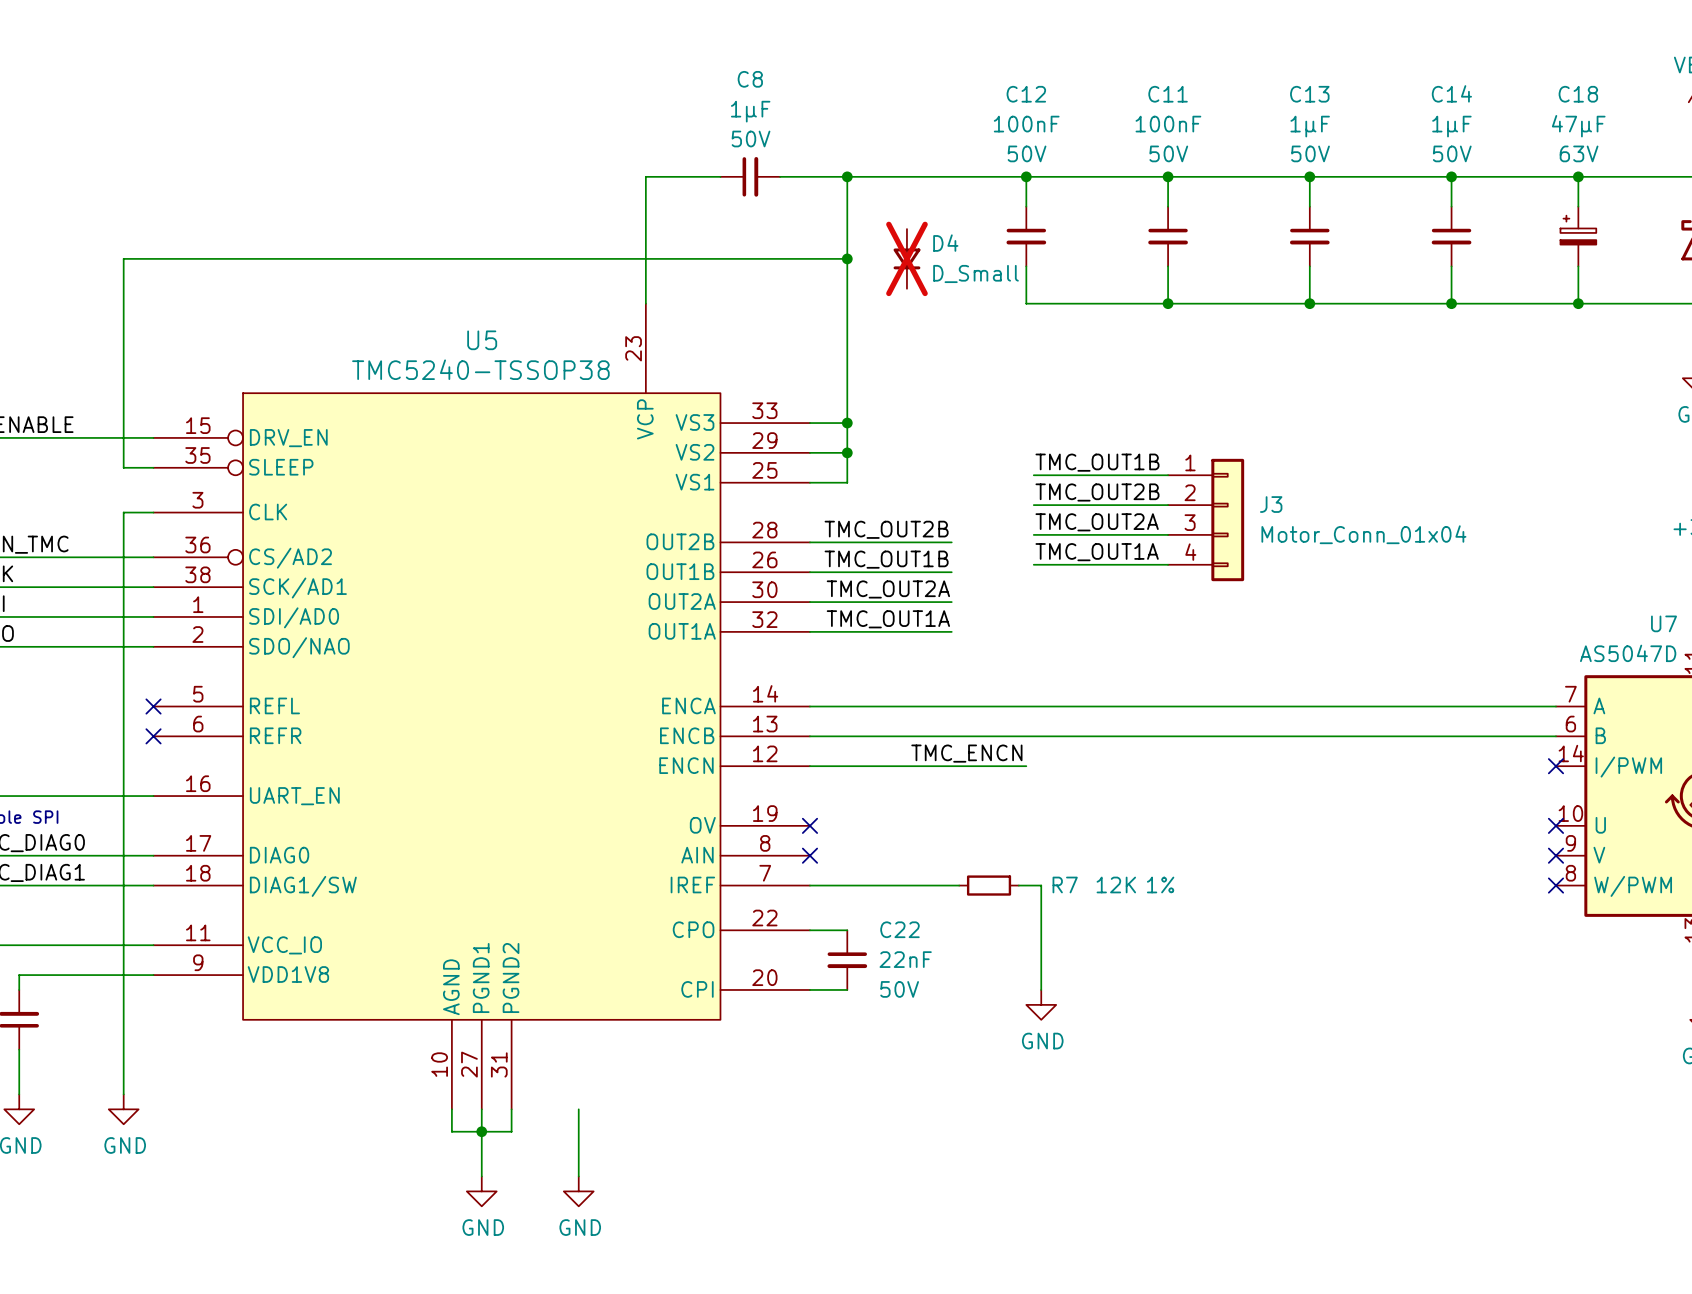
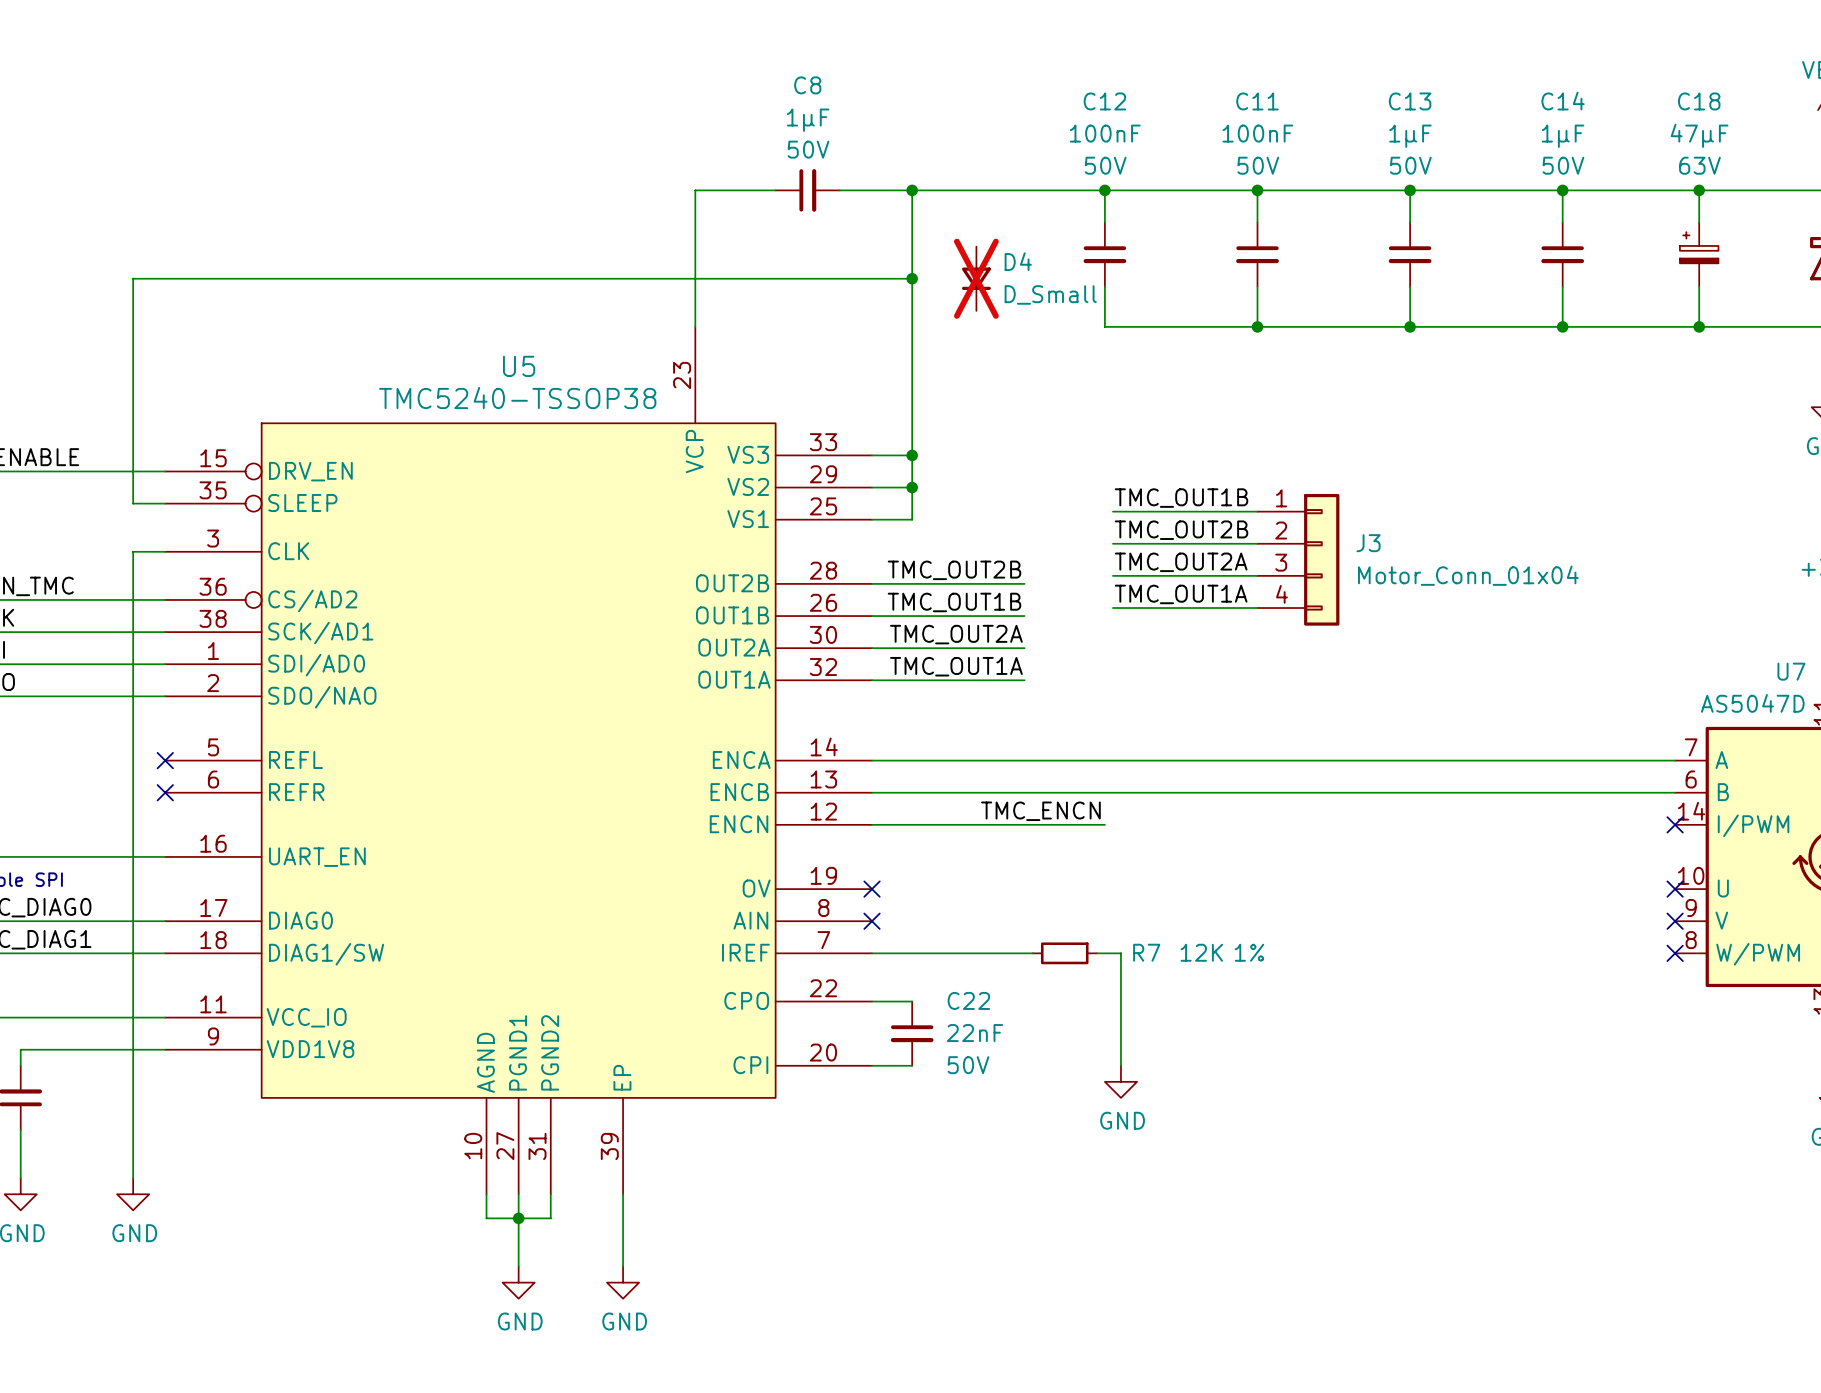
U5 symbol: [153, 303, 810, 1110] -> [165, 326, 873, 1195]

